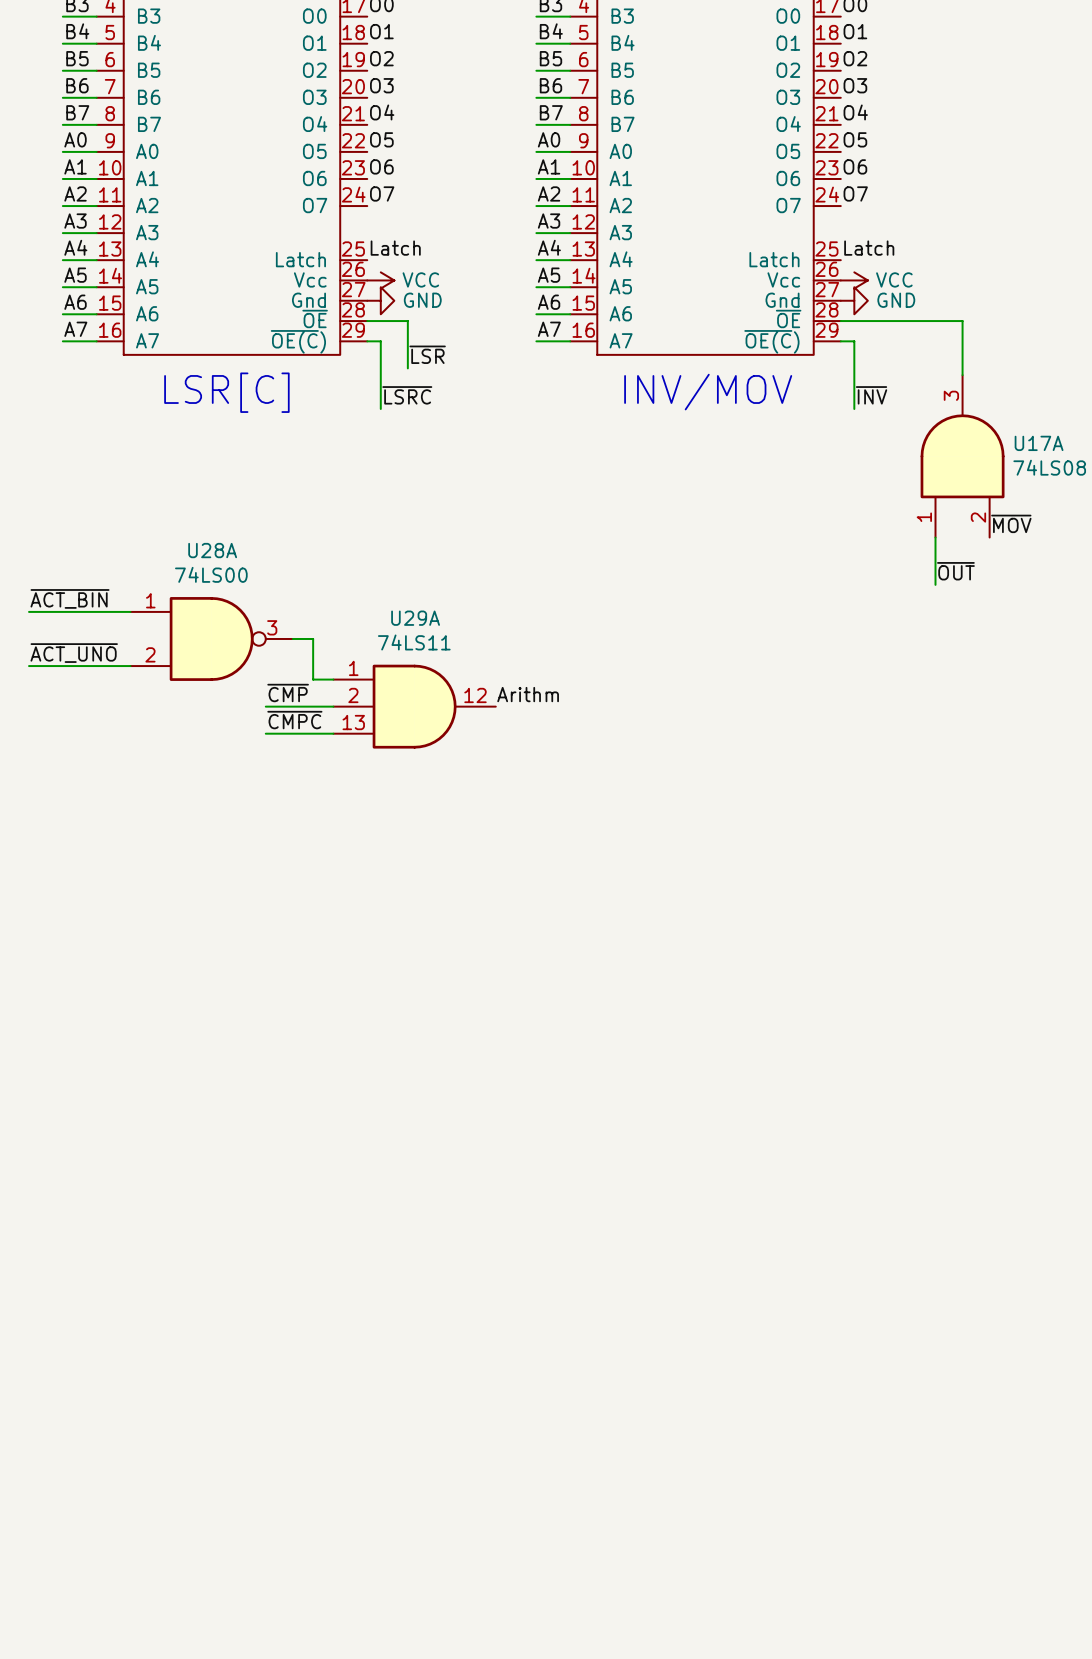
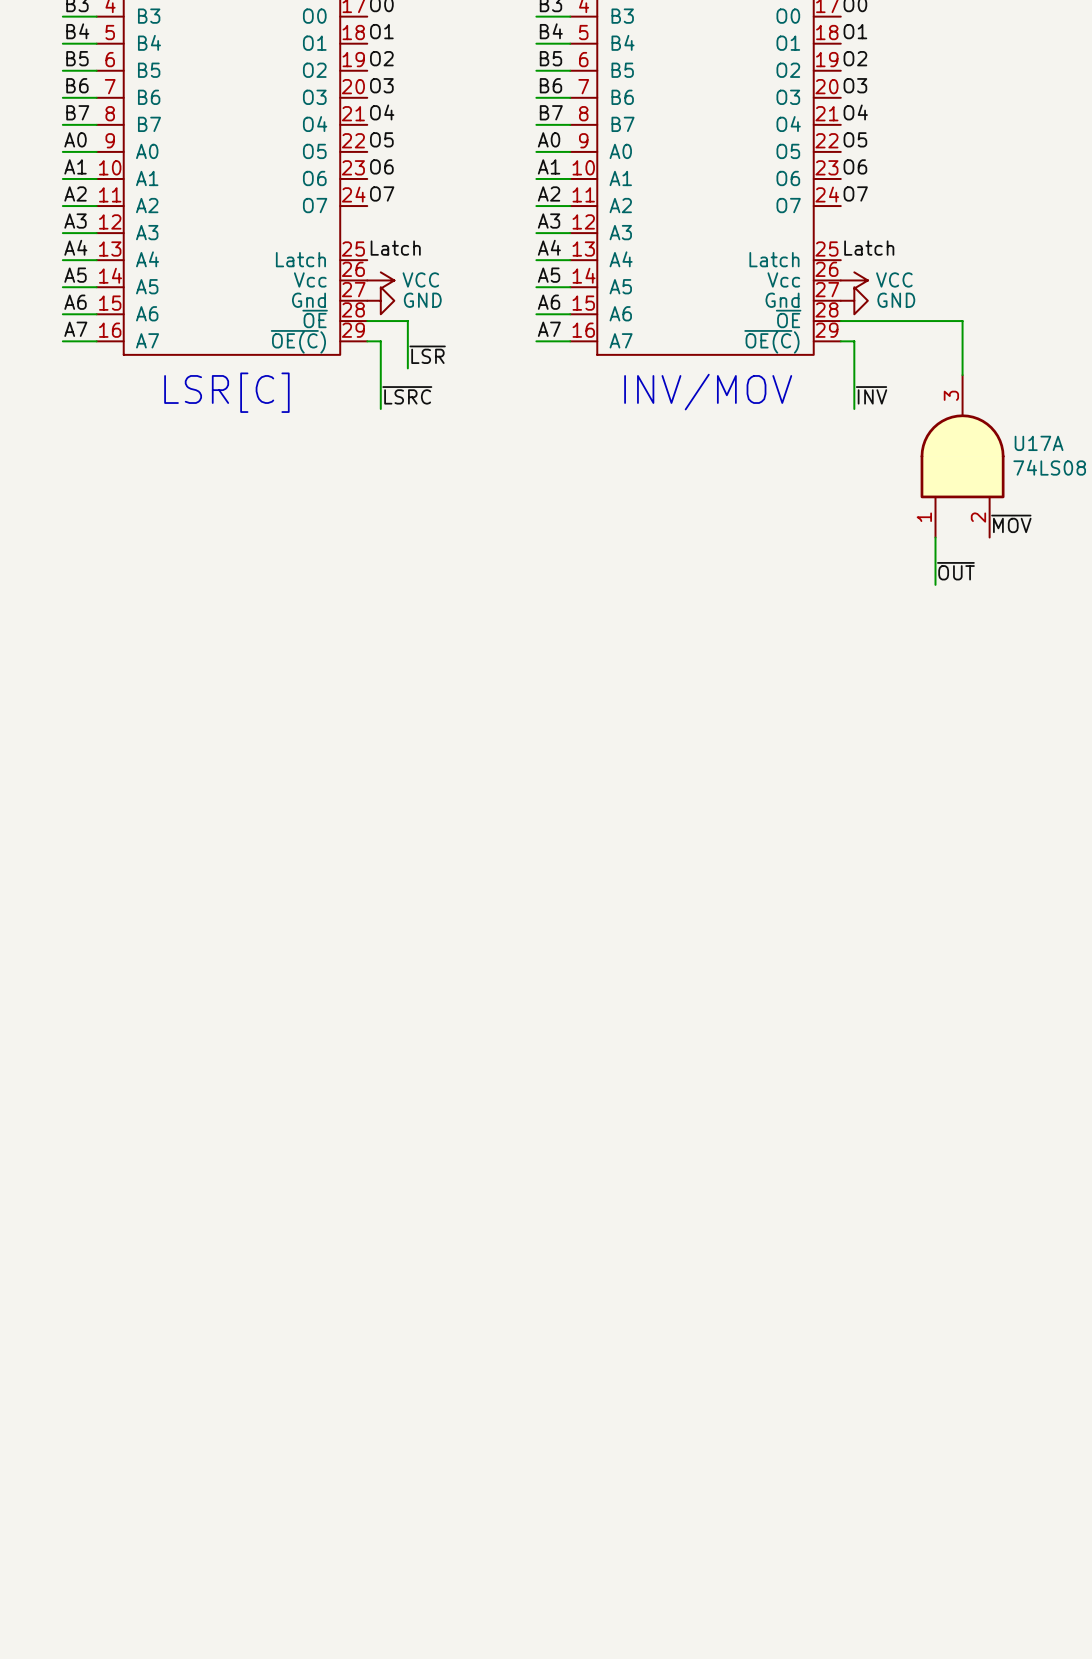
label: ~{ACT_BIN} (70, 598) -> none
wire: (29, 611) (130, 611) -> none
U28A: 74LS00 (211, 638) -> none
wire: (292, 638) (313, 638) (313, 679) (333, 679) -> none
label: ~{ACT_UNO} (74, 653) -> none
wire: (29, 666) (130, 666) -> none
label: ~{CMP} (288, 693) -> none
label: Arithm (528, 694) -> none
wire: (265, 706) (333, 706) -> none
U29A: 74LS11 (414, 706) -> none
label: ~{CMPC} (294, 720) -> none
wire: (265, 733) (333, 733) -> none

